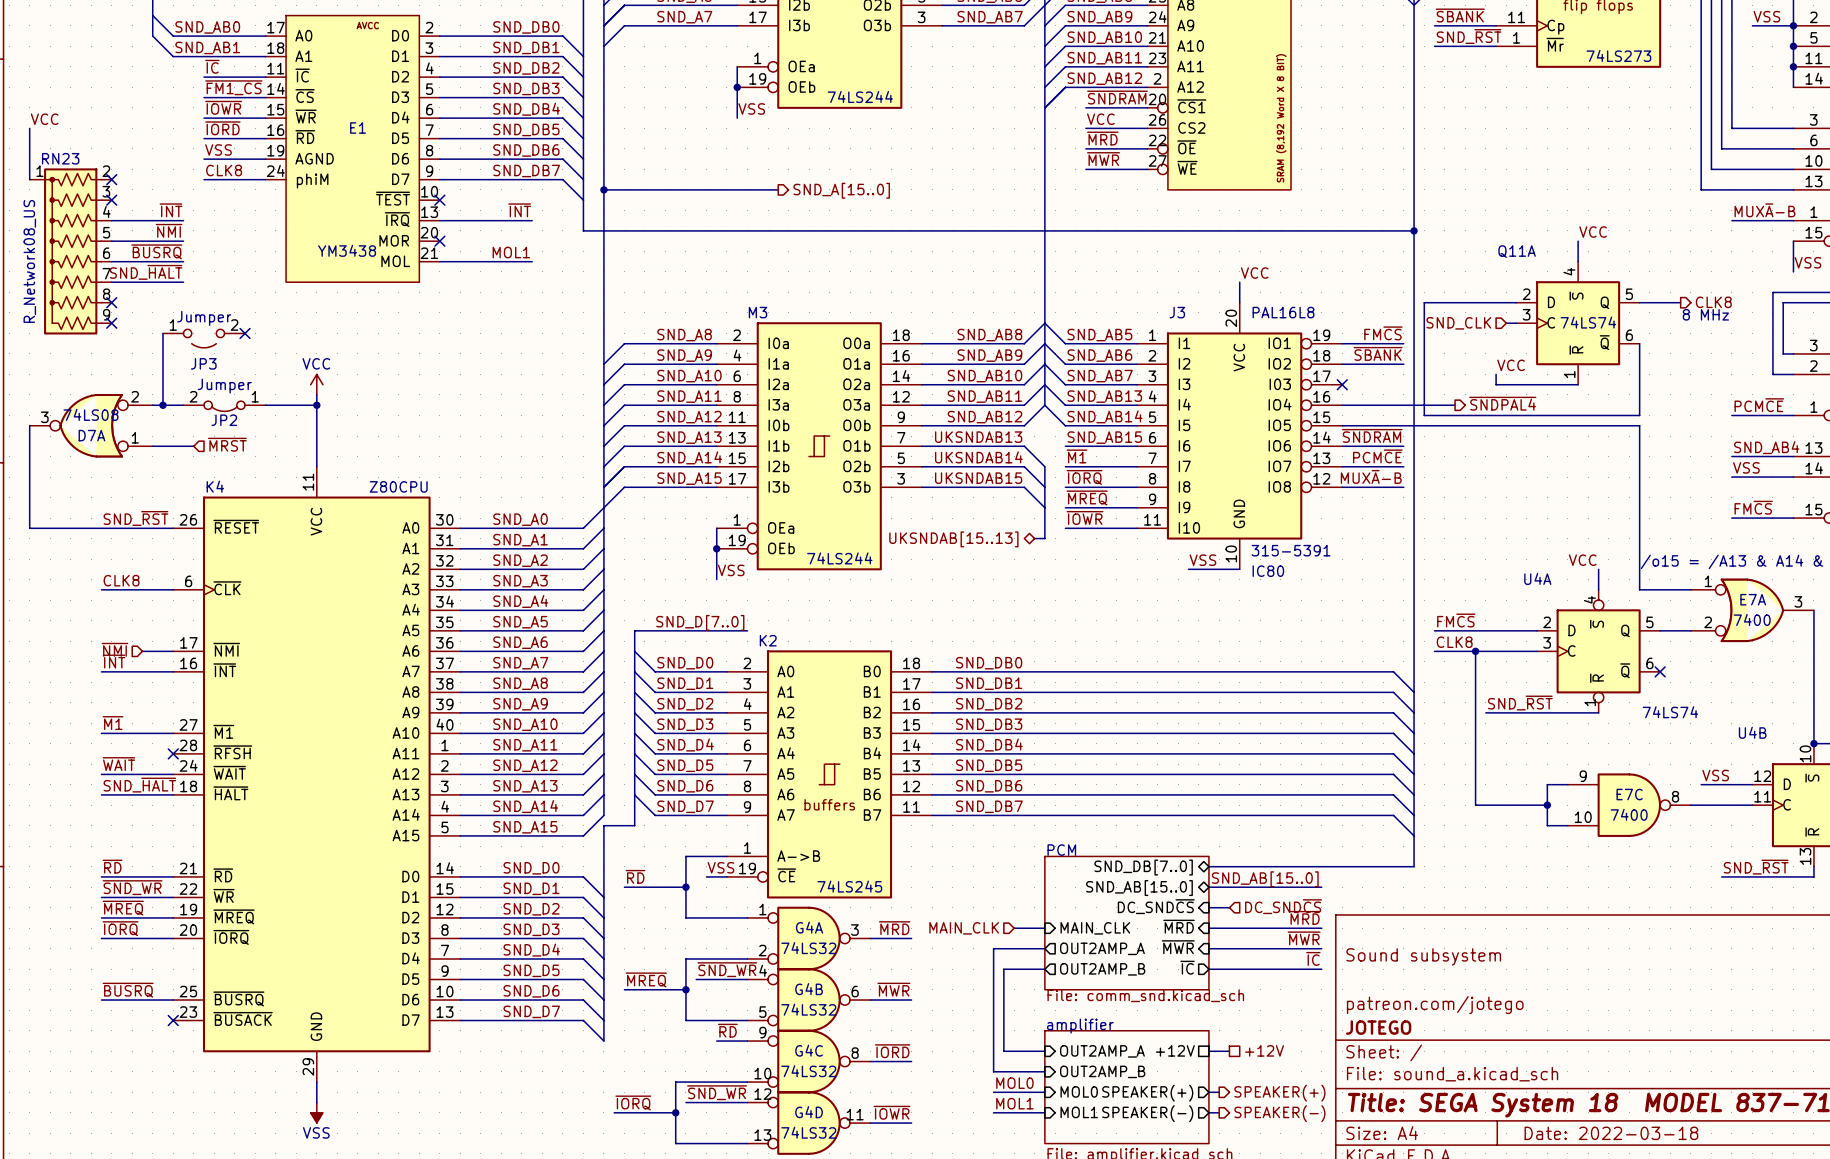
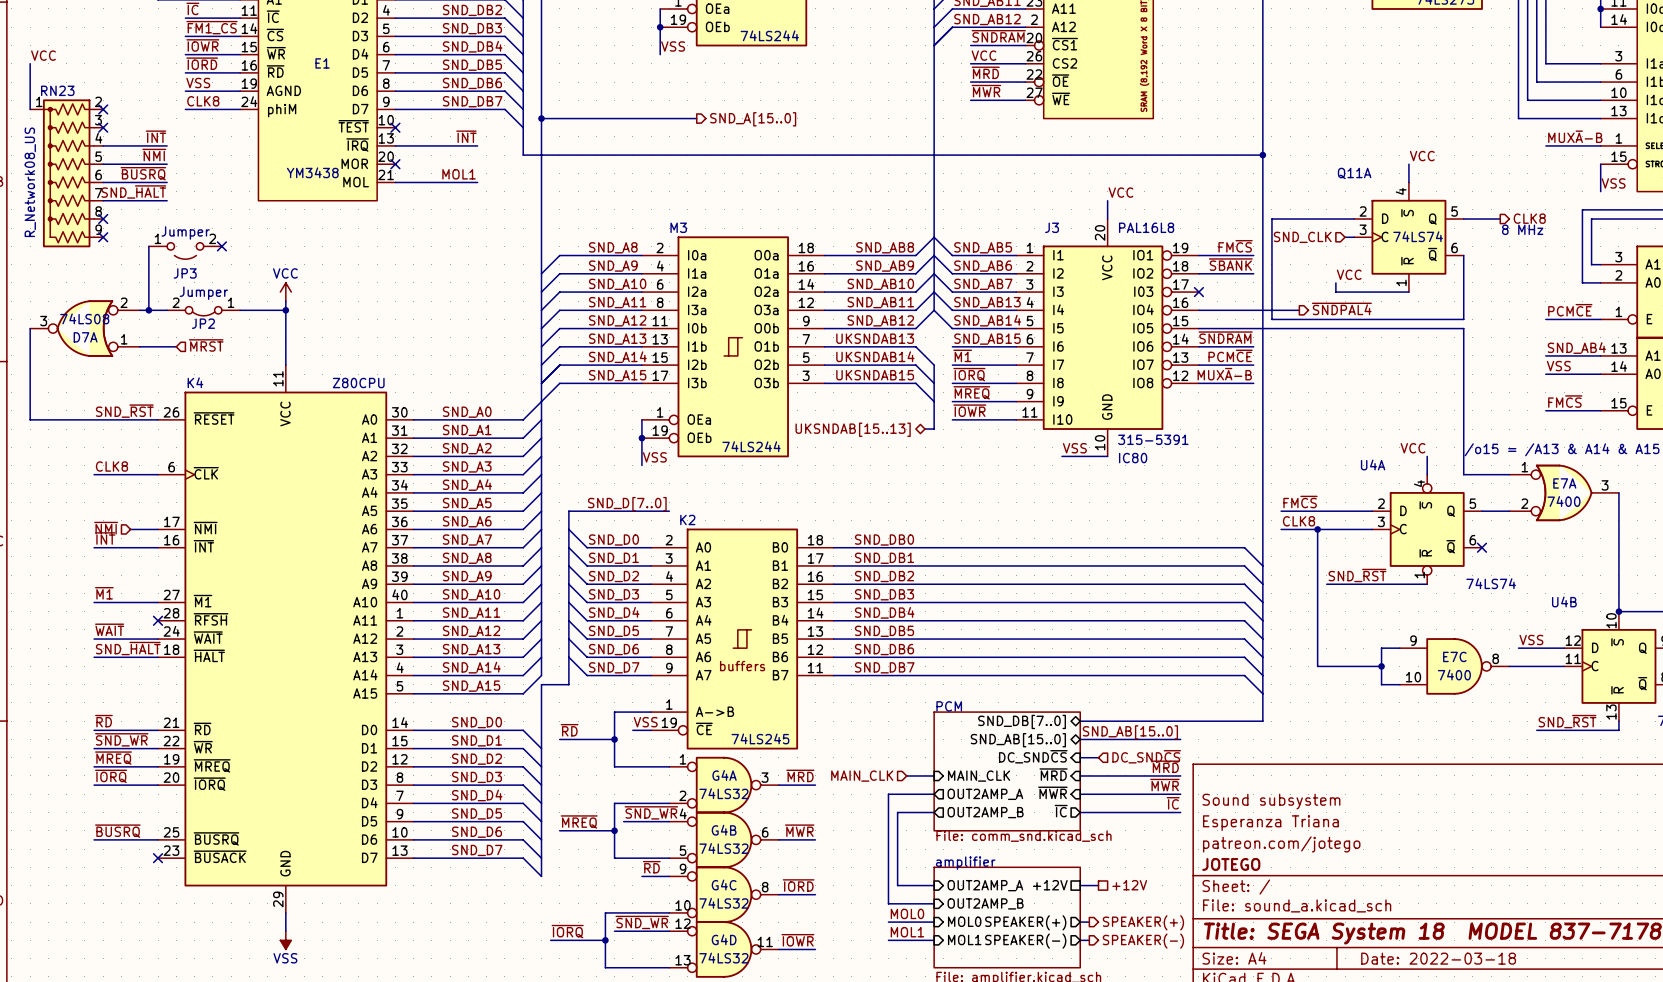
title block: none -> Esperanza Triana (1270, 823)

